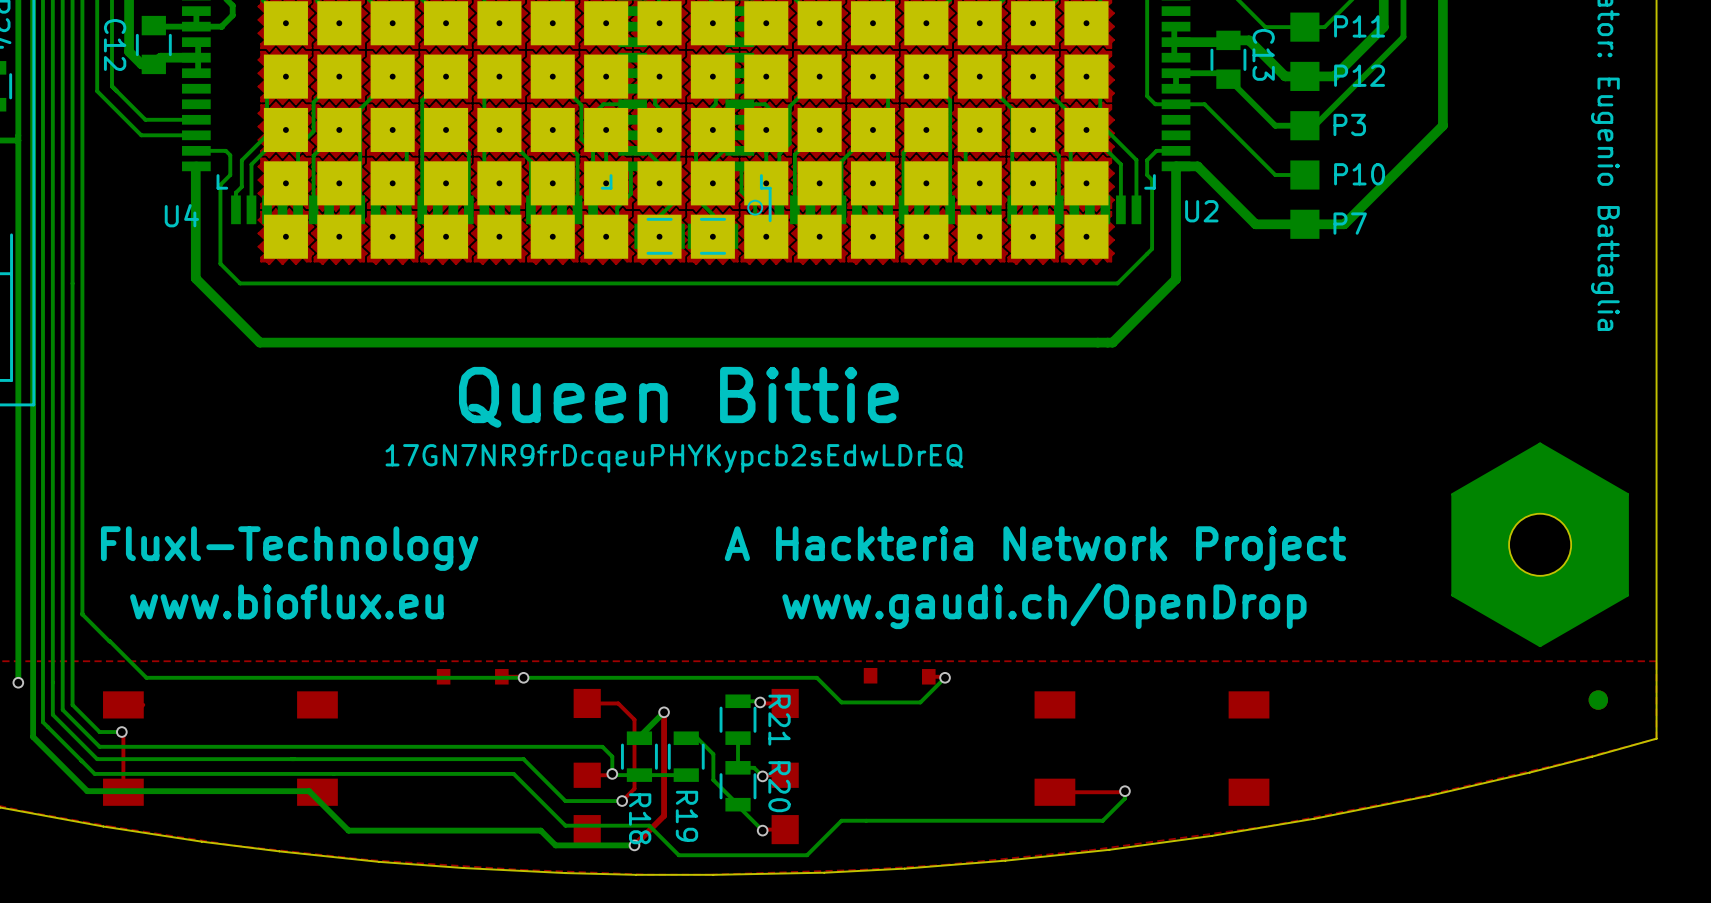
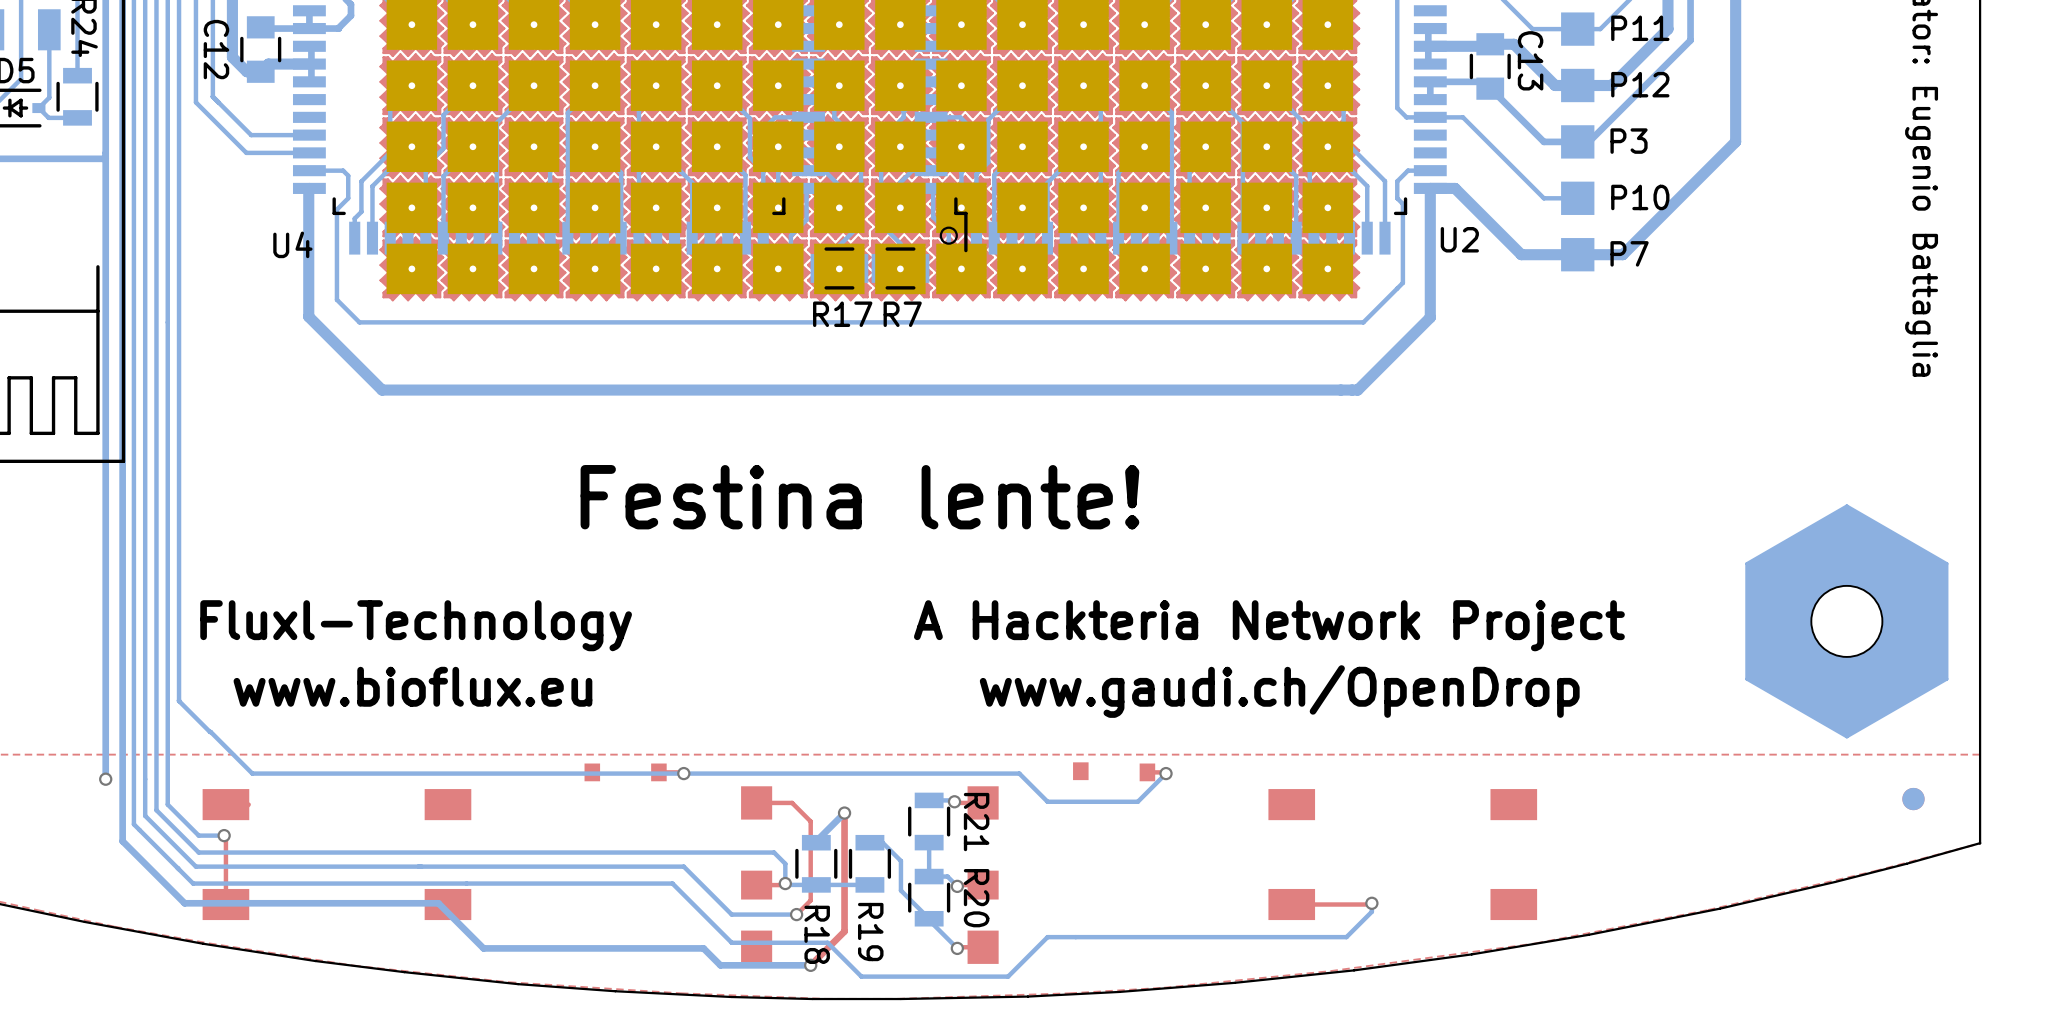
R17 name: none -> R17 (842, 314)
R7 name: none -> R7 (902, 314)
text: Queen Bittie (678, 397) -> none
text: 17GN7NR9frDcqeuPHYKypcb2sEdwLDrEQ (674, 458) -> Festina lente! (859, 497)

